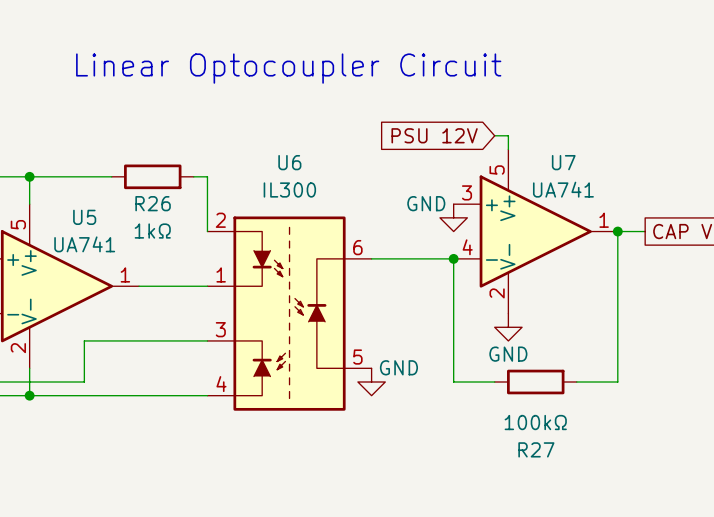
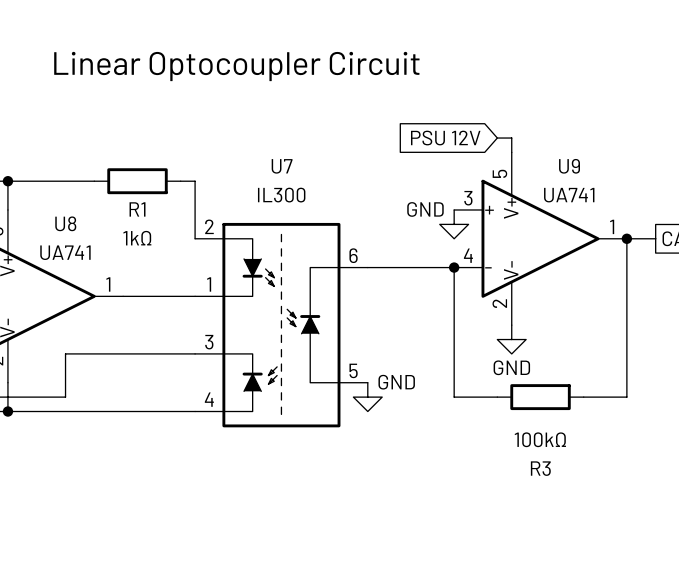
U6 name: U6 (289, 162) -> U7 (282, 166)
U7 name: U7 (563, 162) -> U9 (569, 166)
R26 name: R26 (153, 203) -> R1 (137, 209)
U5 name: U5 (84, 217) -> U8 (65, 223)
R27 name: R27 (536, 449) -> R3 (540, 468)

